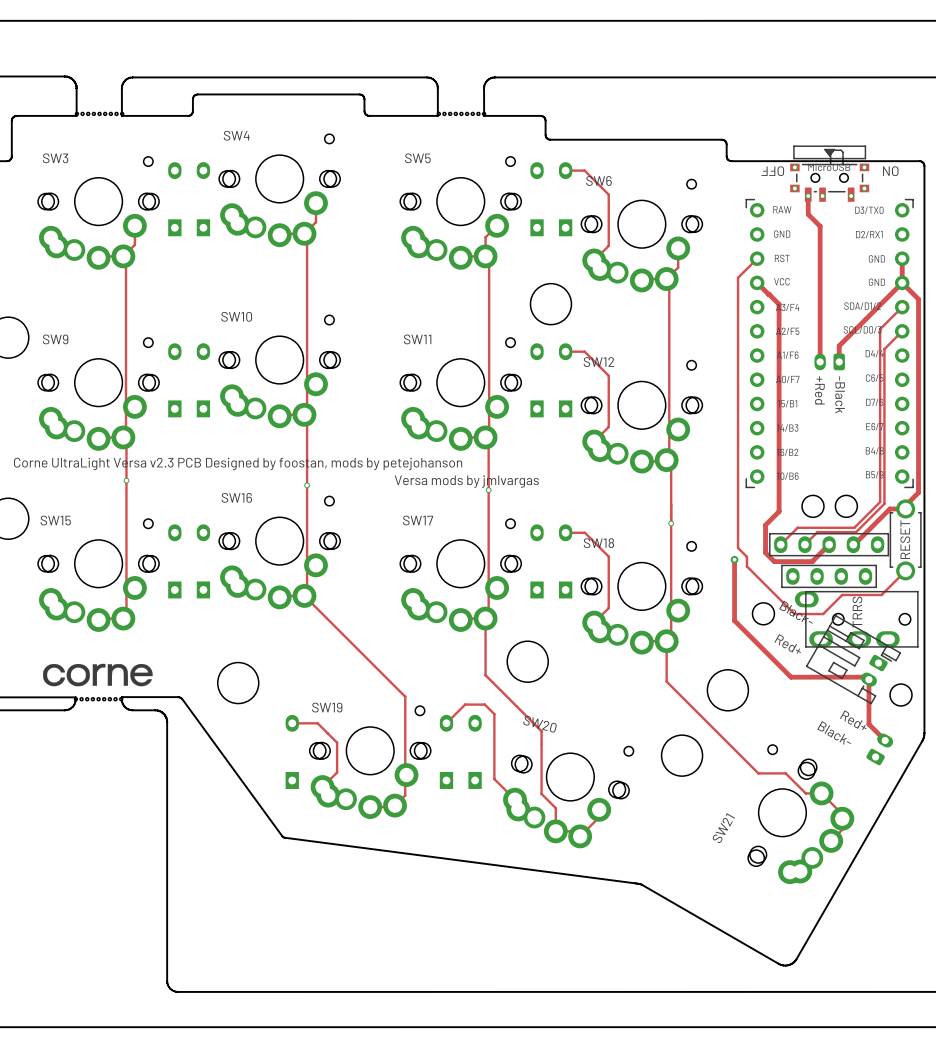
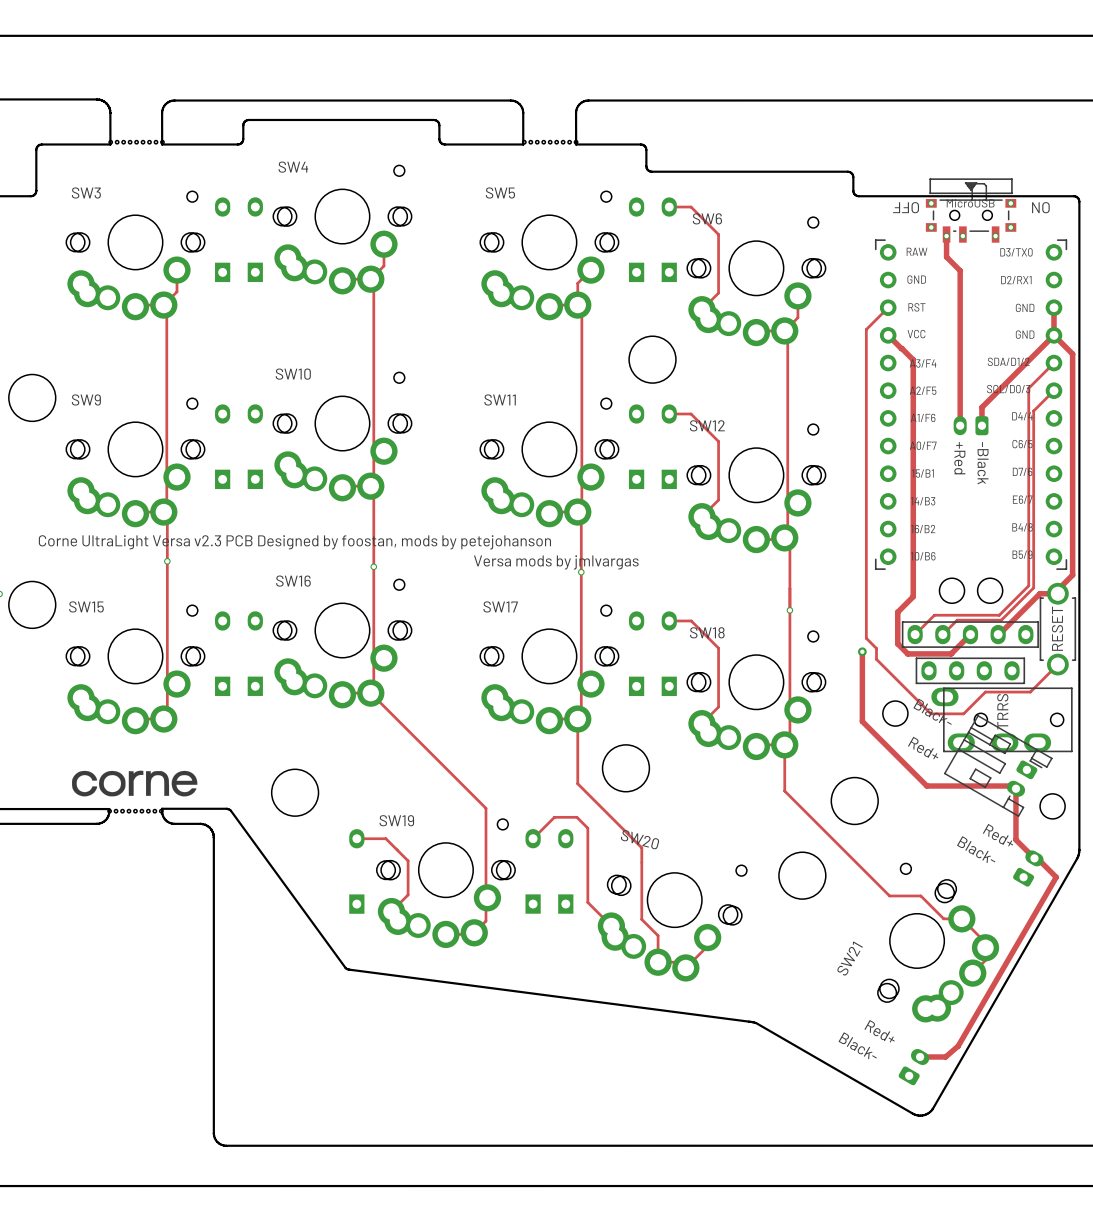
track: none -> (1034, 858) (1037, 858) (1056, 877) (958, 1046) (945, 1056) (920, 1056)
text: none -> Red+ (879, 1031)
text: none -> Black- (857, 1045)
part: none -> (913, 1067)

